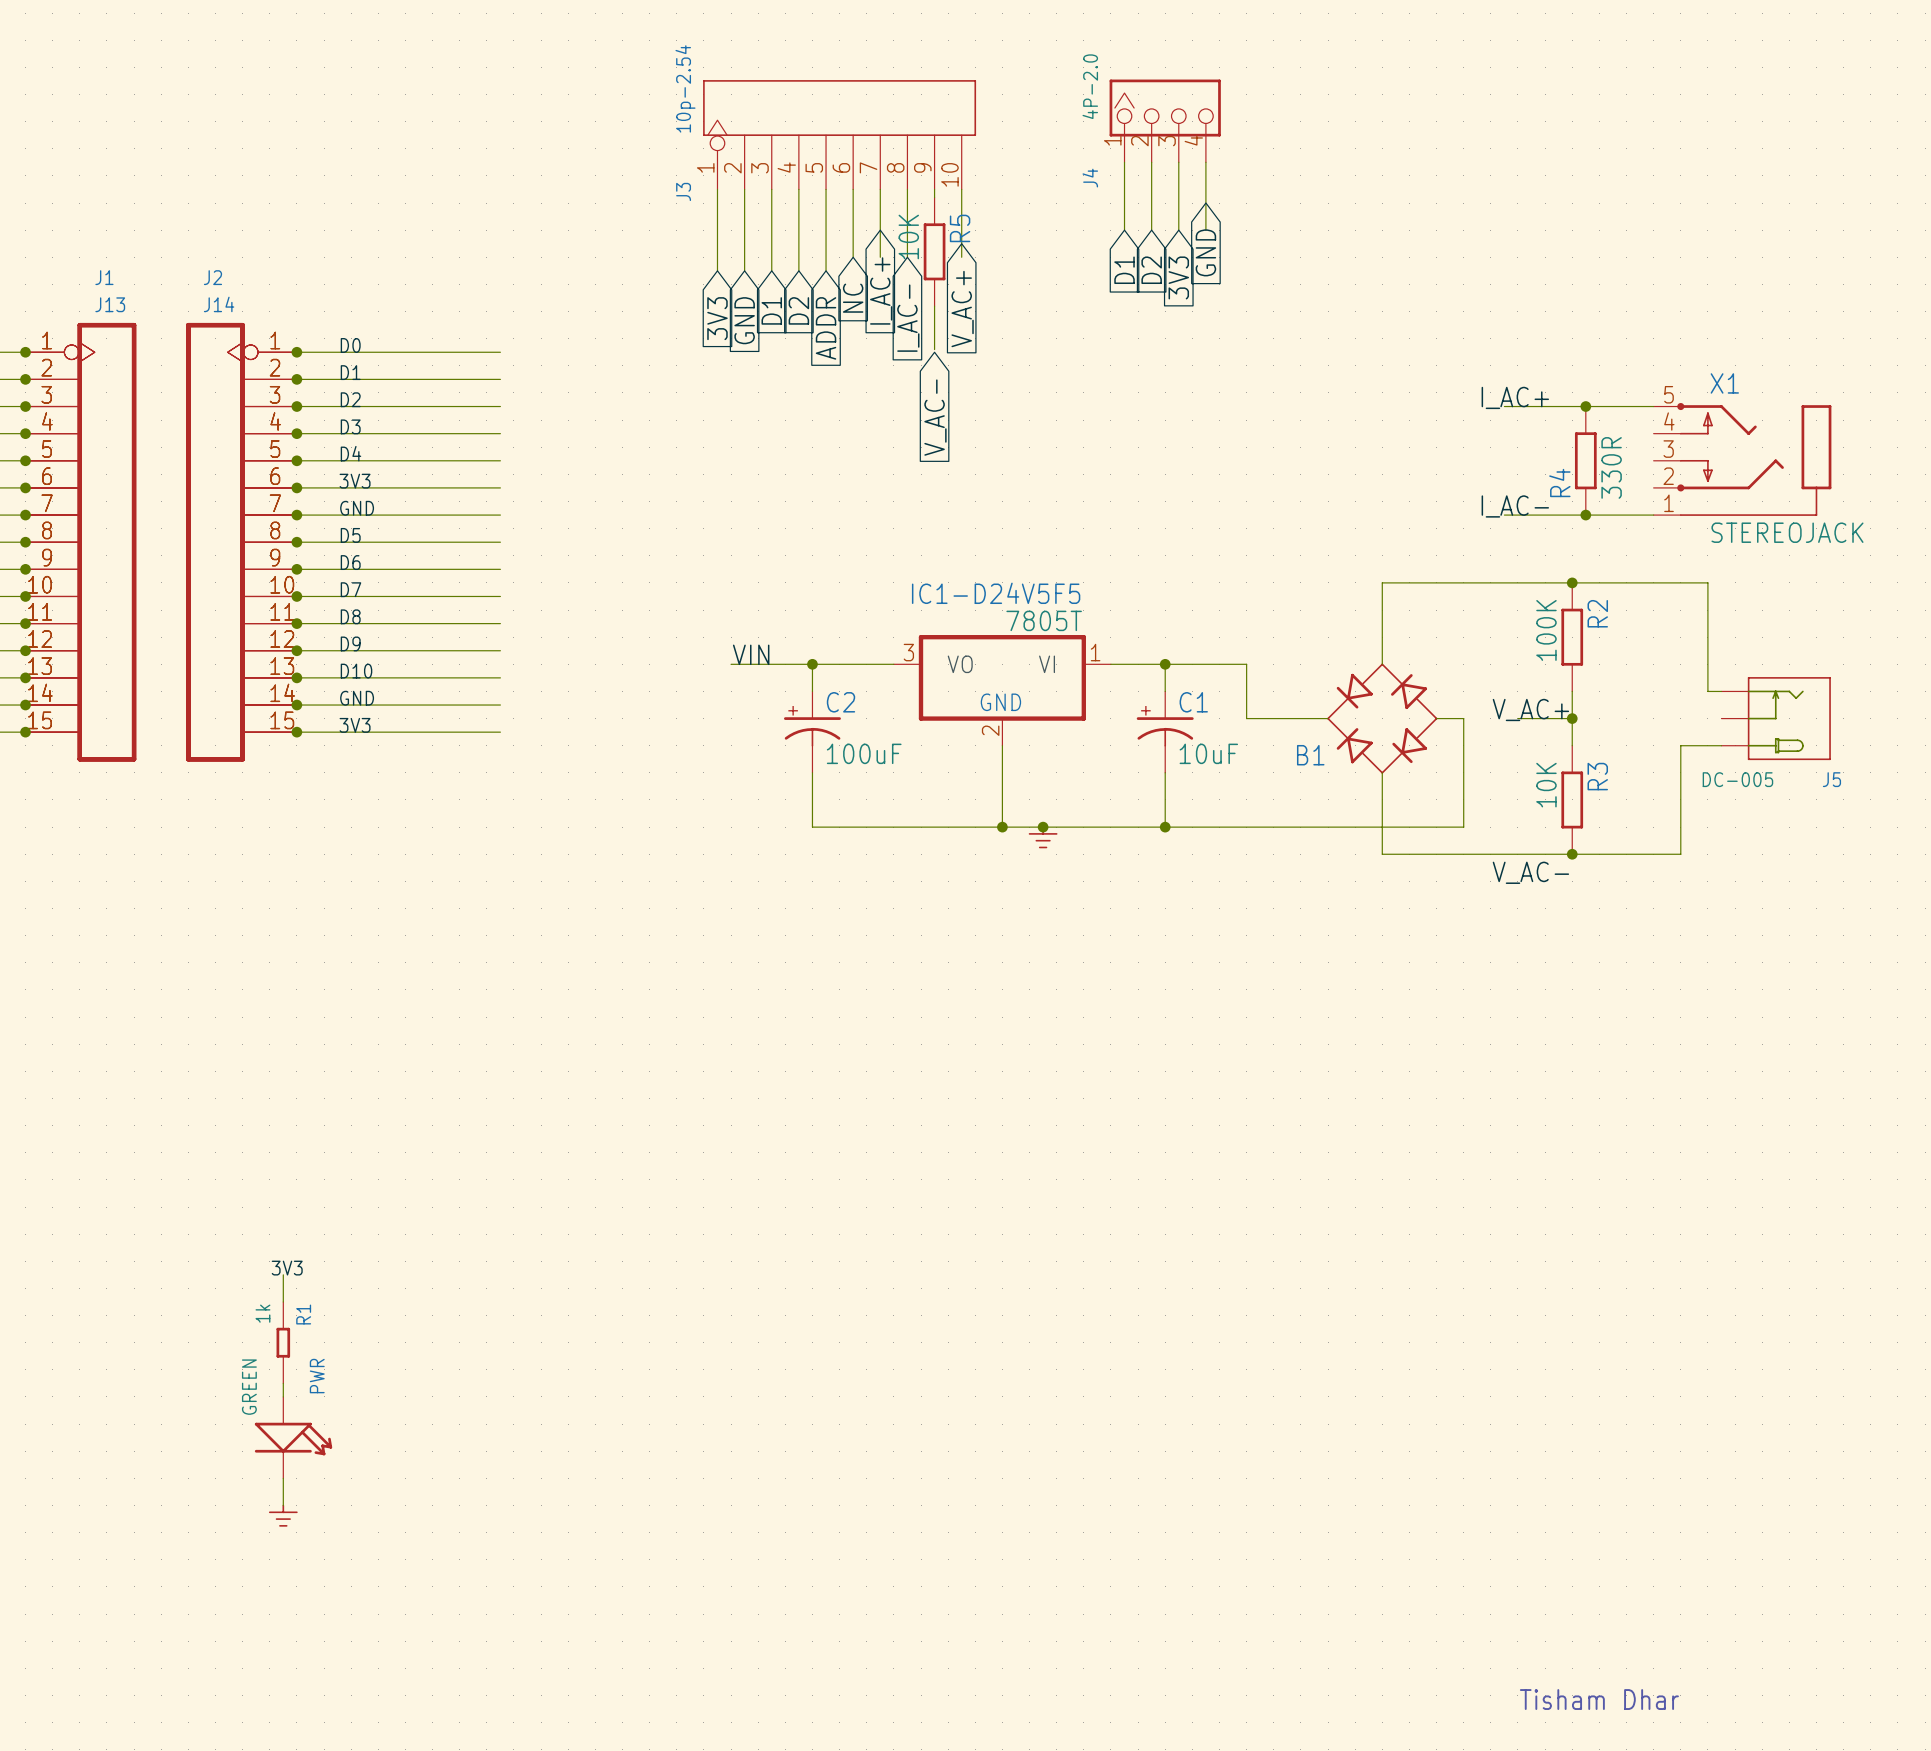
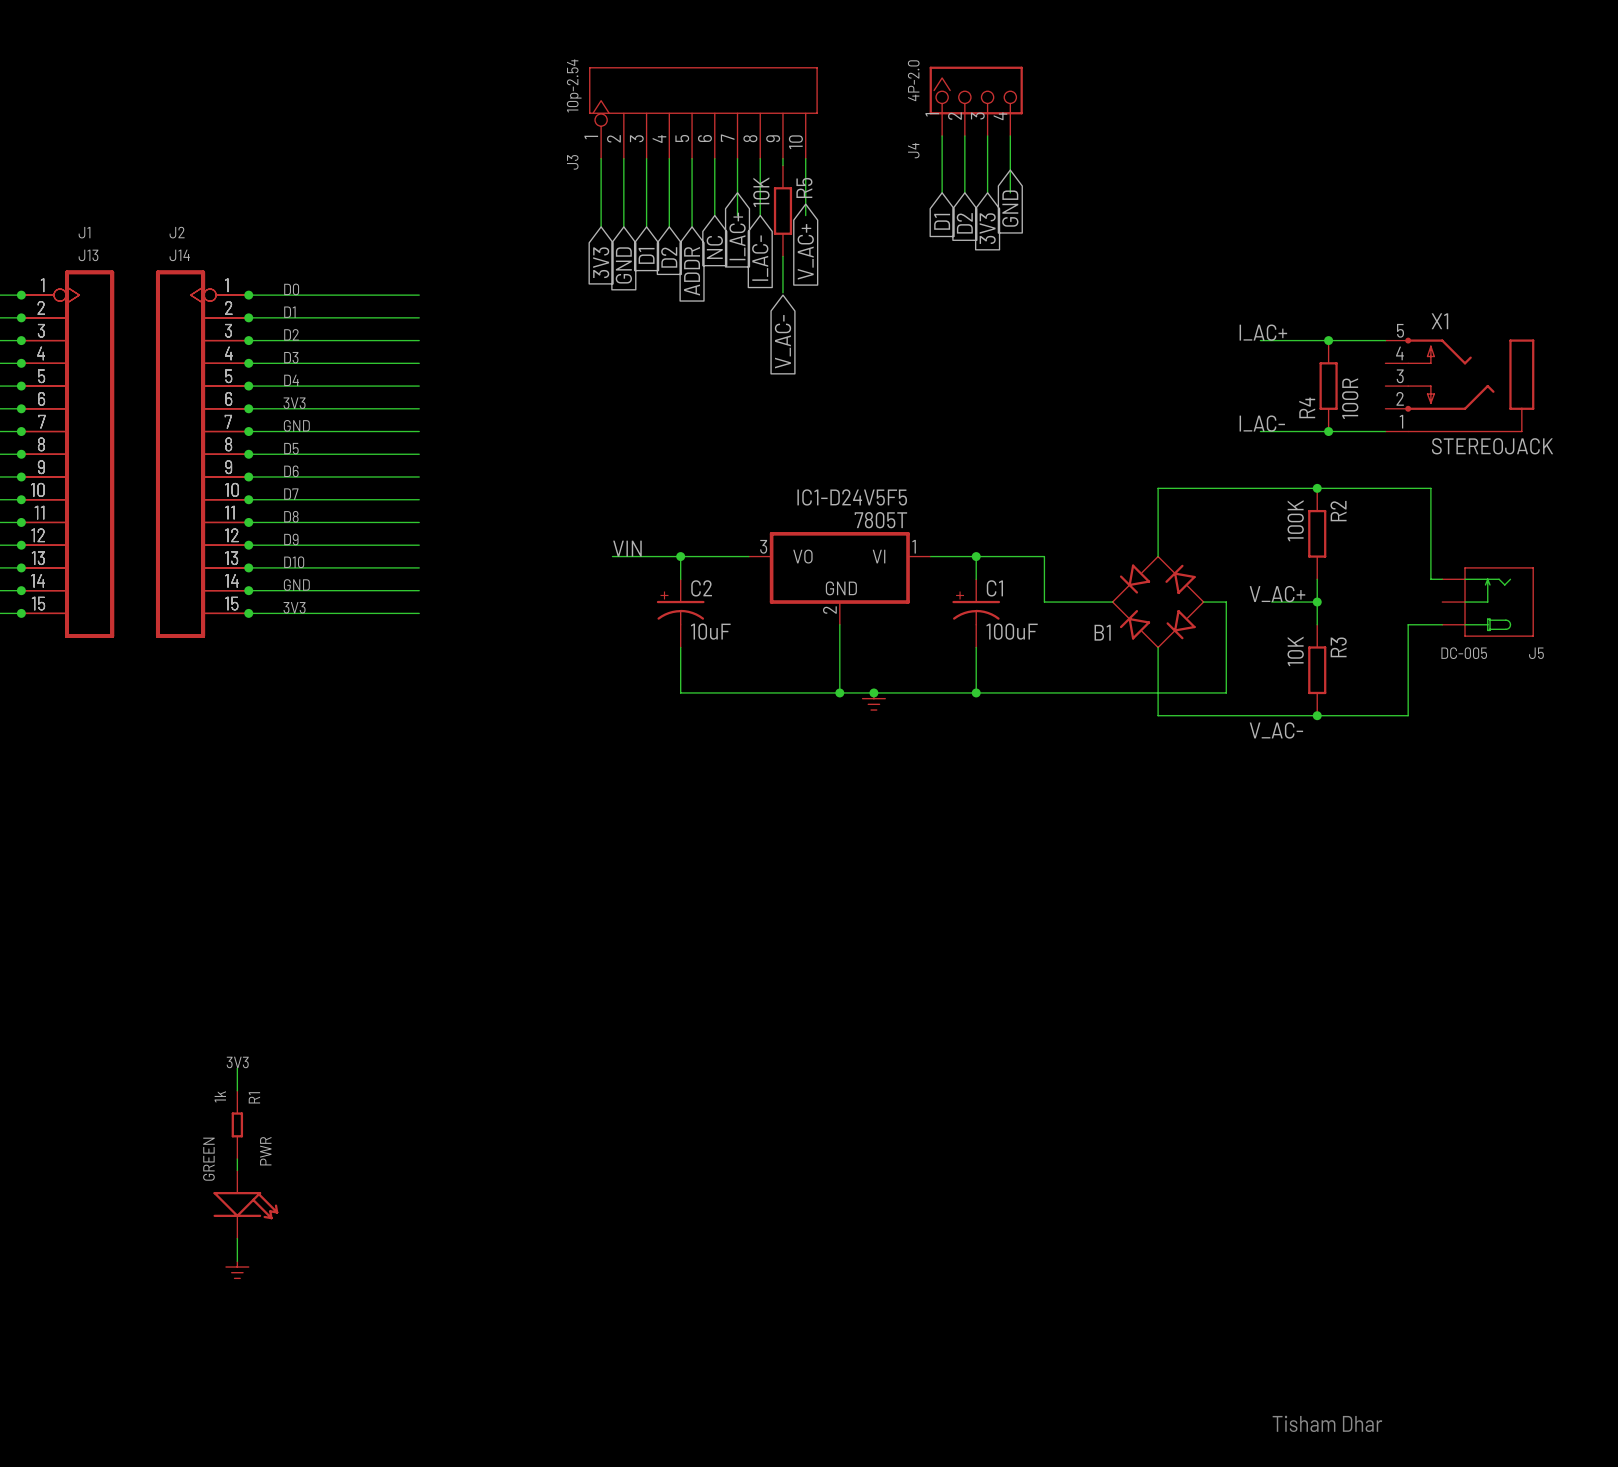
R4 value: 330R (1611, 467) -> 100R (1350, 398)
C2 value: 100uF (864, 753) -> 10uF (710, 631)
C1 value: 10uF (1208, 753) -> 100uF (1012, 631)

